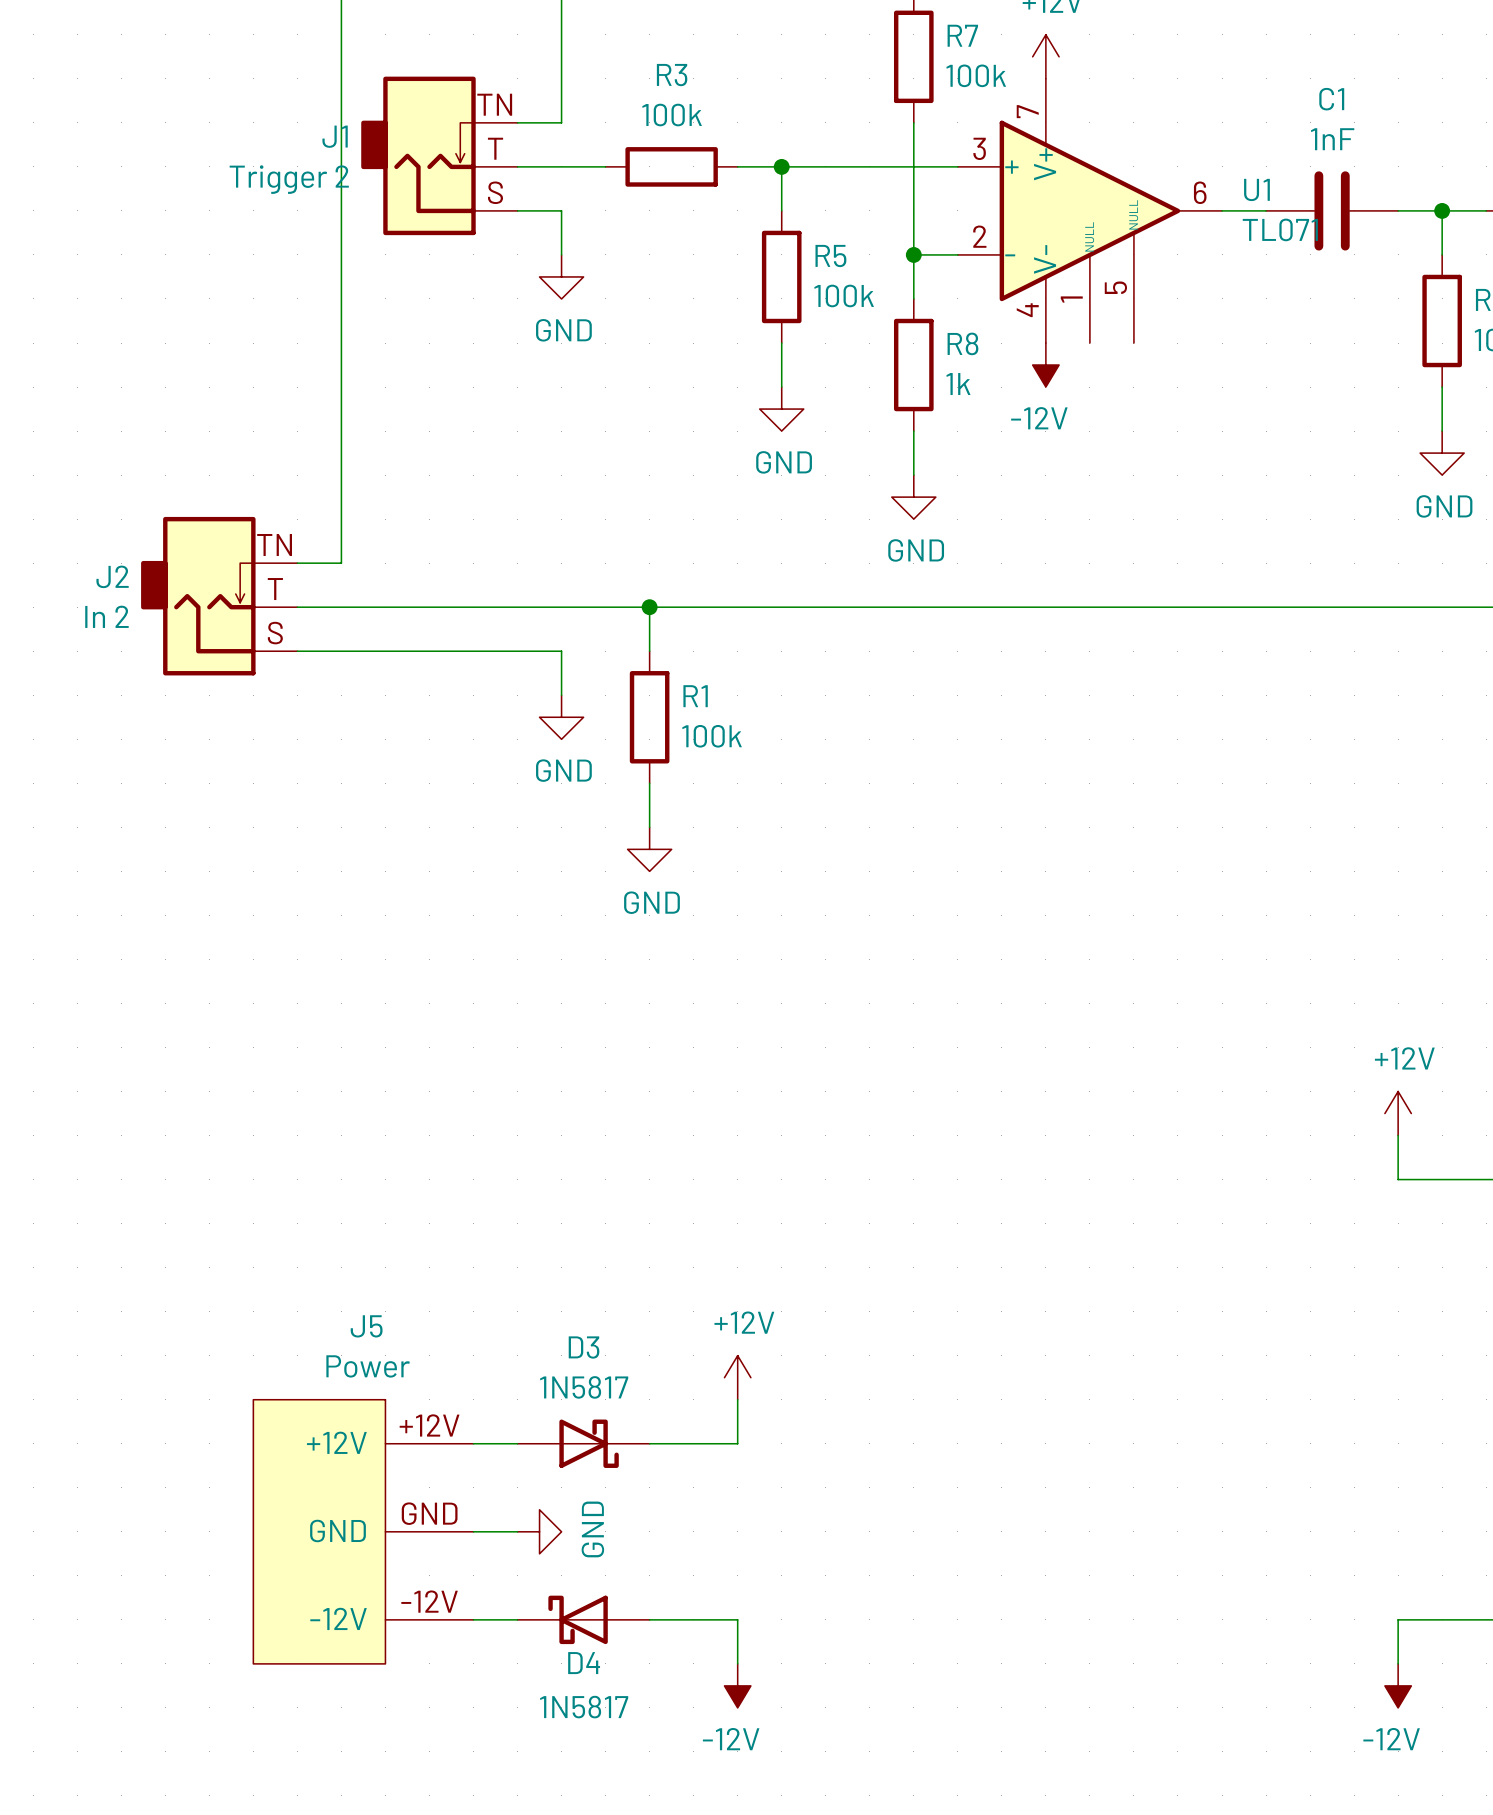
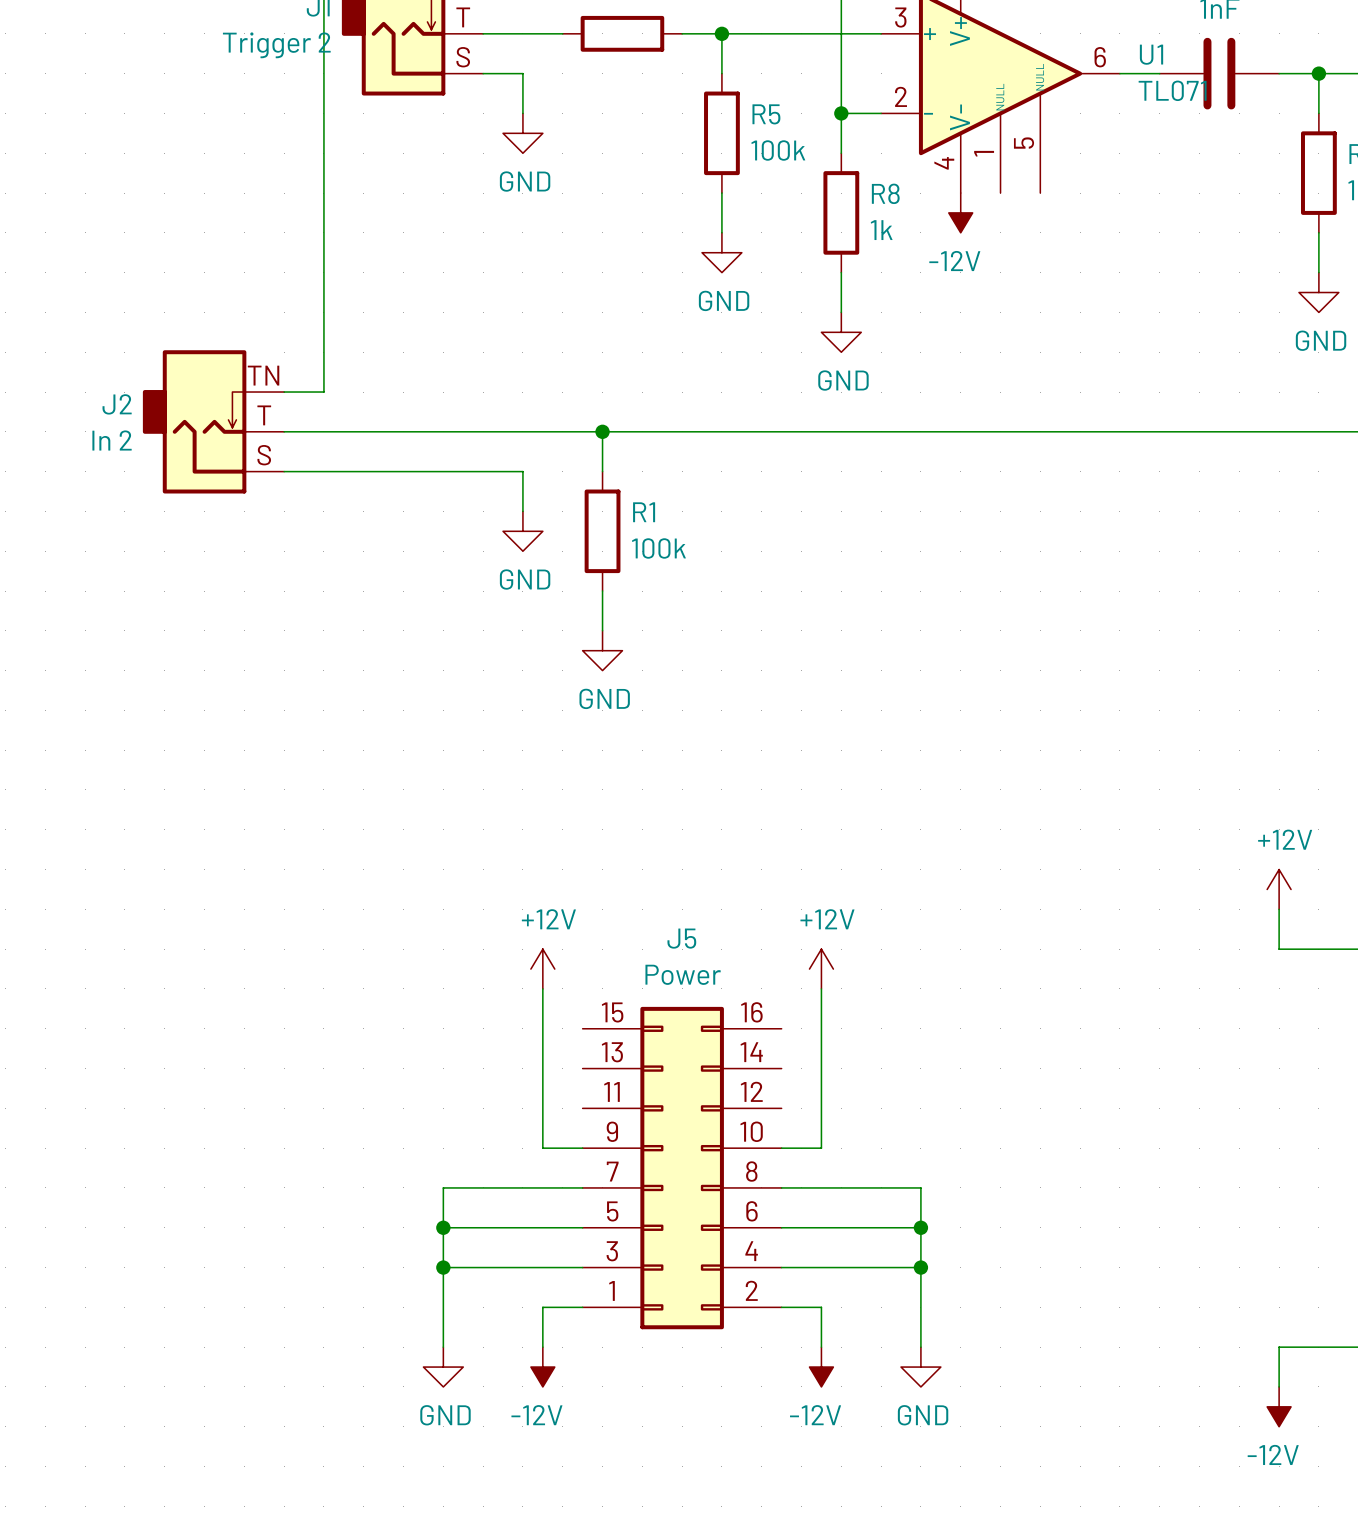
power symbol: none -> +12V (542, 969)
power symbol: none -> +12V (821, 969)
wire: none -> (542, 988) (542, 1148) (582, 1148)
wire: none -> (821, 988) (821, 1148) (781, 1148)
J5 name position: J5 (366, 1326) -> J5 (681, 938)
J5 value position: Power (368, 1366) -> Power (683, 974)
power symbol: +12V (737, 1377) -> none
J5 symbol: [253, 1399, 474, 1664] -> [582, 1006, 782, 1330]
D3: 1N5817 (583, 1443) -> none
wire: none -> (781, 1187) (920, 1187) (920, 1347)
wire: none -> (443, 1227) (582, 1227)
junction: none -> (443, 1227)
wire: none -> (781, 1227) (920, 1227)
junction: none -> (920, 1227)
junction: none -> (443, 1267)
wire: none -> (483, 1267) (582, 1267)
power symbol rotation: 0° (539, 1531) -> 90° clockwise (443, 1367)
power symbol position: GND (539, 1531) -> GND (443, 1367)
wire: none -> (781, 1267) (920, 1267)
junction: none -> (920, 1267)
wire: none -> (582, 1307) (542, 1307) (542, 1347)
wire: none -> (781, 1307) (821, 1307) (821, 1347)
wire: (473, 1619) (517, 1619) -> (443, 1347) (443, 1187)
D4: 1N5817 (583, 1619) -> none
wire: (649, 1619) (737, 1619) (737, 1663) -> none
power symbol: none -> -12V (542, 1367)
power symbol: none -> -12V (821, 1367)
power symbol: none -> GND (920, 1367)
power symbol: -12V (737, 1685) -> none

